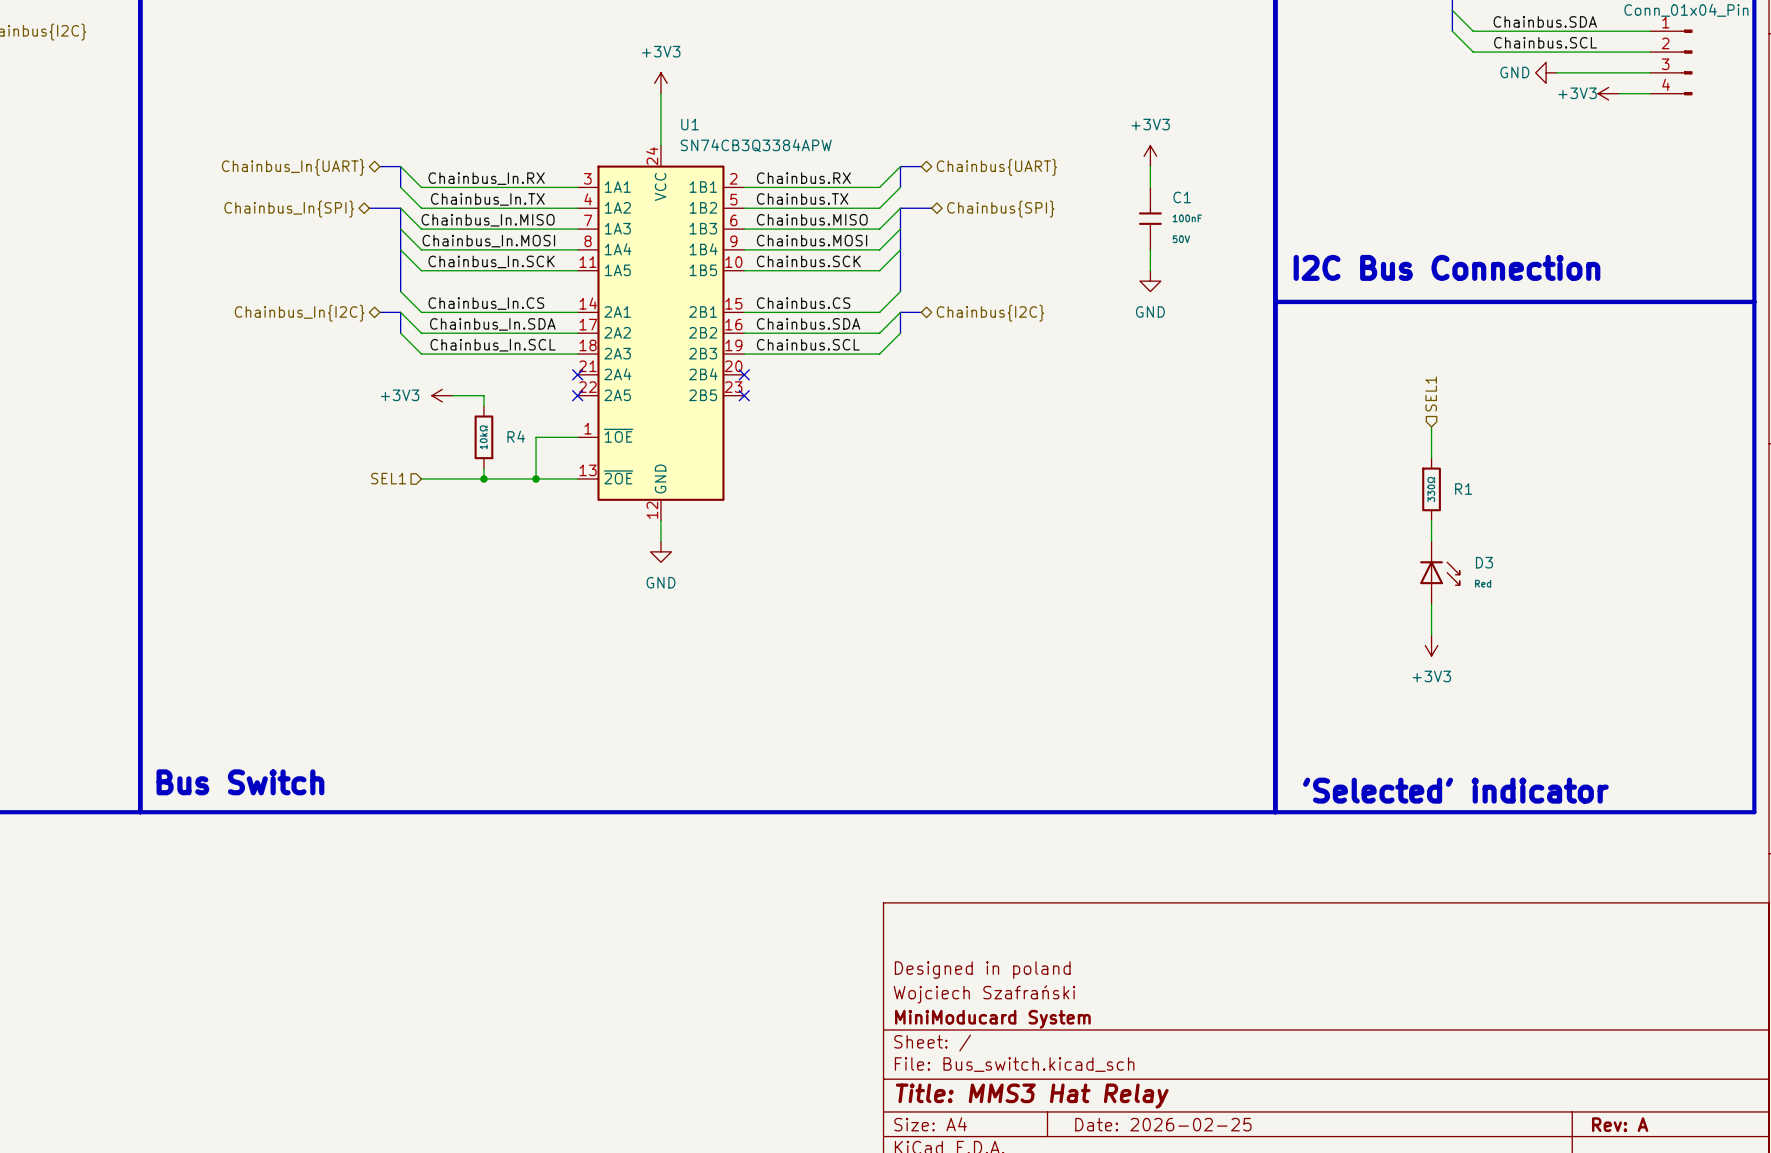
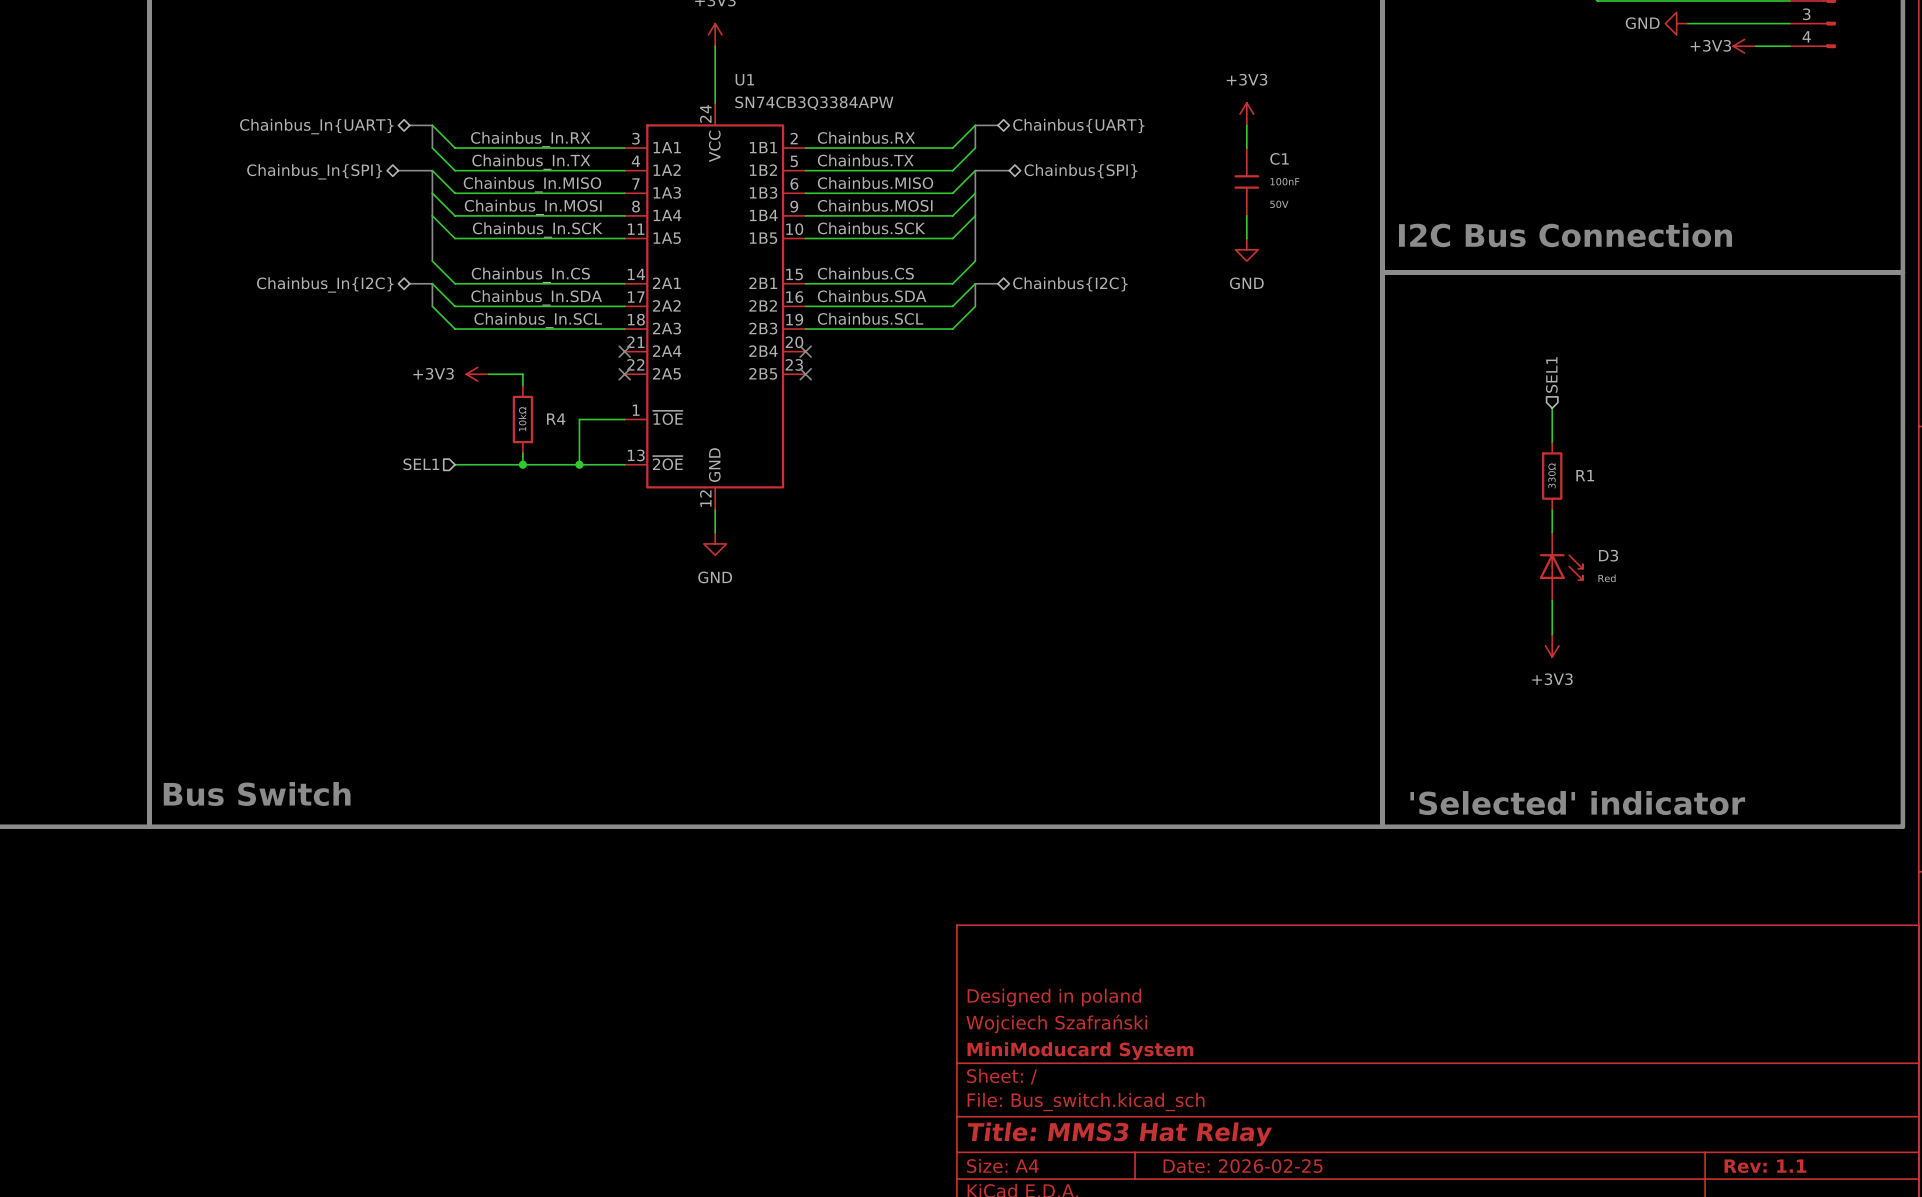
title block: Rev: A (1620, 1124) -> Rev: 1.1 (1765, 1166)

